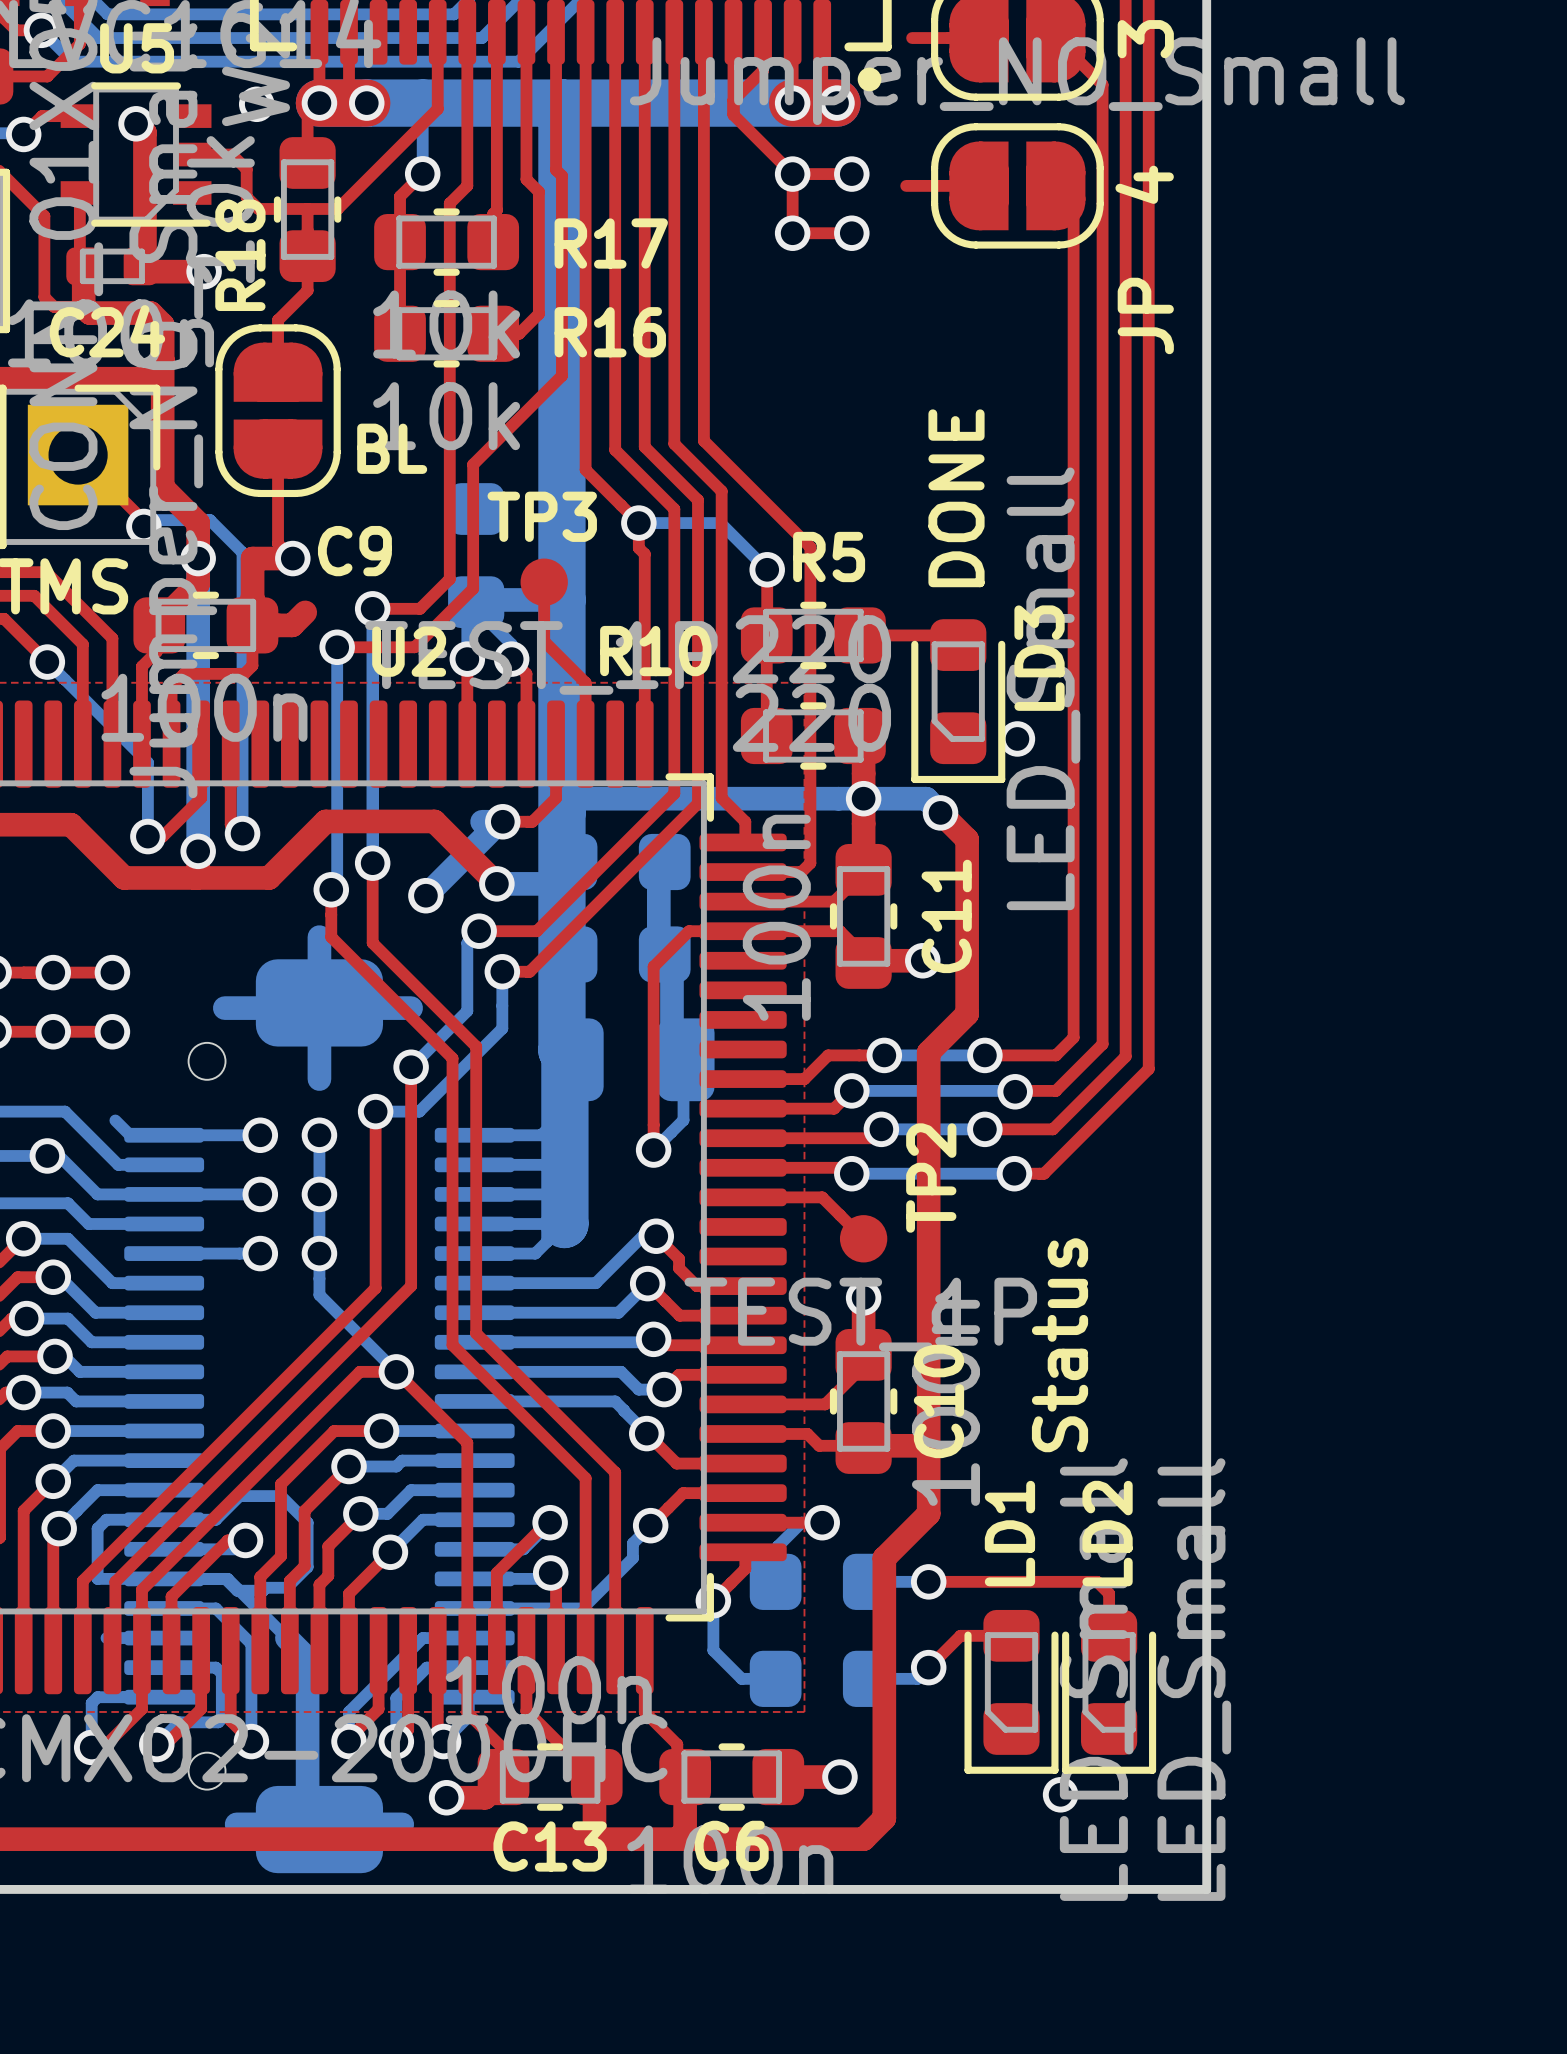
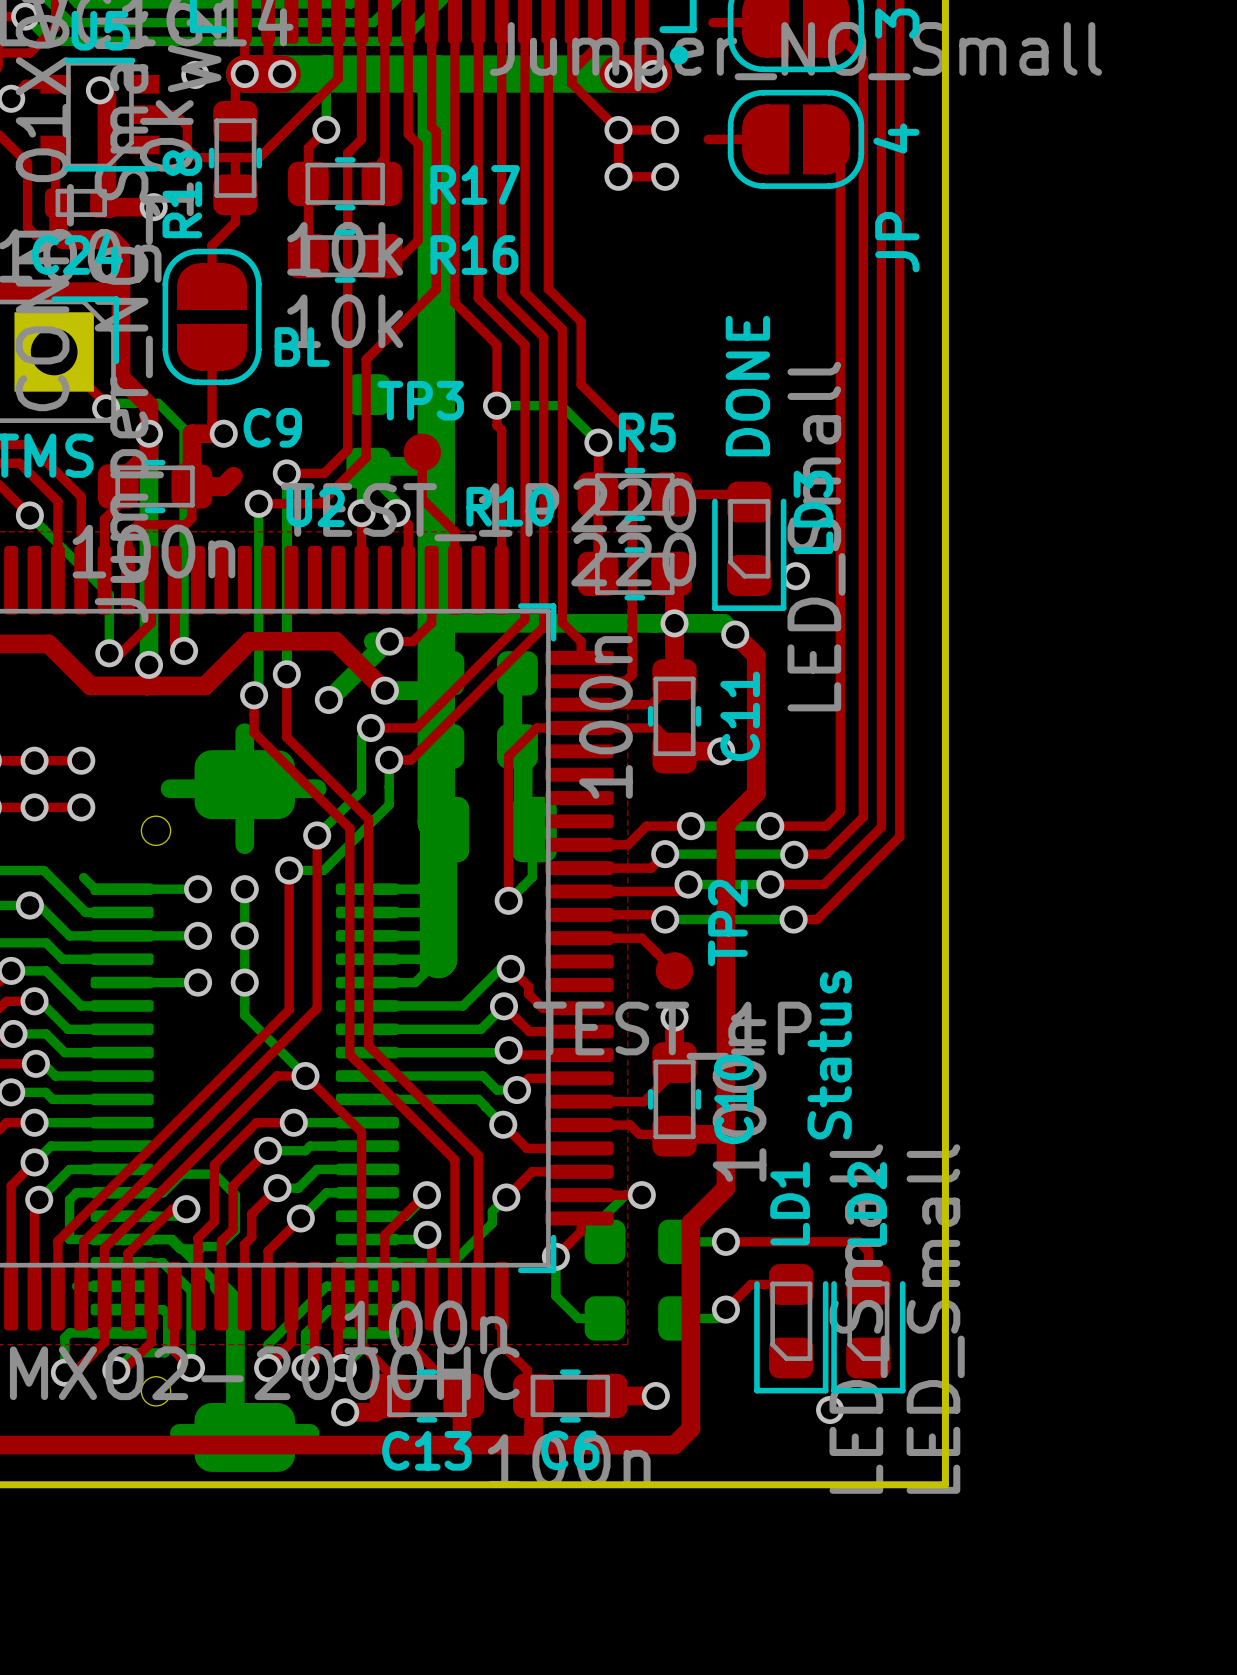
top track: (703, 375) (703, 440) (810, 547) (810, 561) -> (548, 289) (581, 321) (581, 384) (632, 436)
top track: (674, 379) (674, 443) (721, 491) -> (525, 292) (562, 329) (562, 380)
top track: (644, 383) (644, 446) (698, 500) -> (501, 295) (543, 337) (543, 387)
top track: (615, 387) (615, 449) (674, 509) -> (478, 298) (525, 344) (525, 394)
top track: (585, 392) (585, 469) (638, 523) -> (454, 302) (497, 344) (497, 405)

